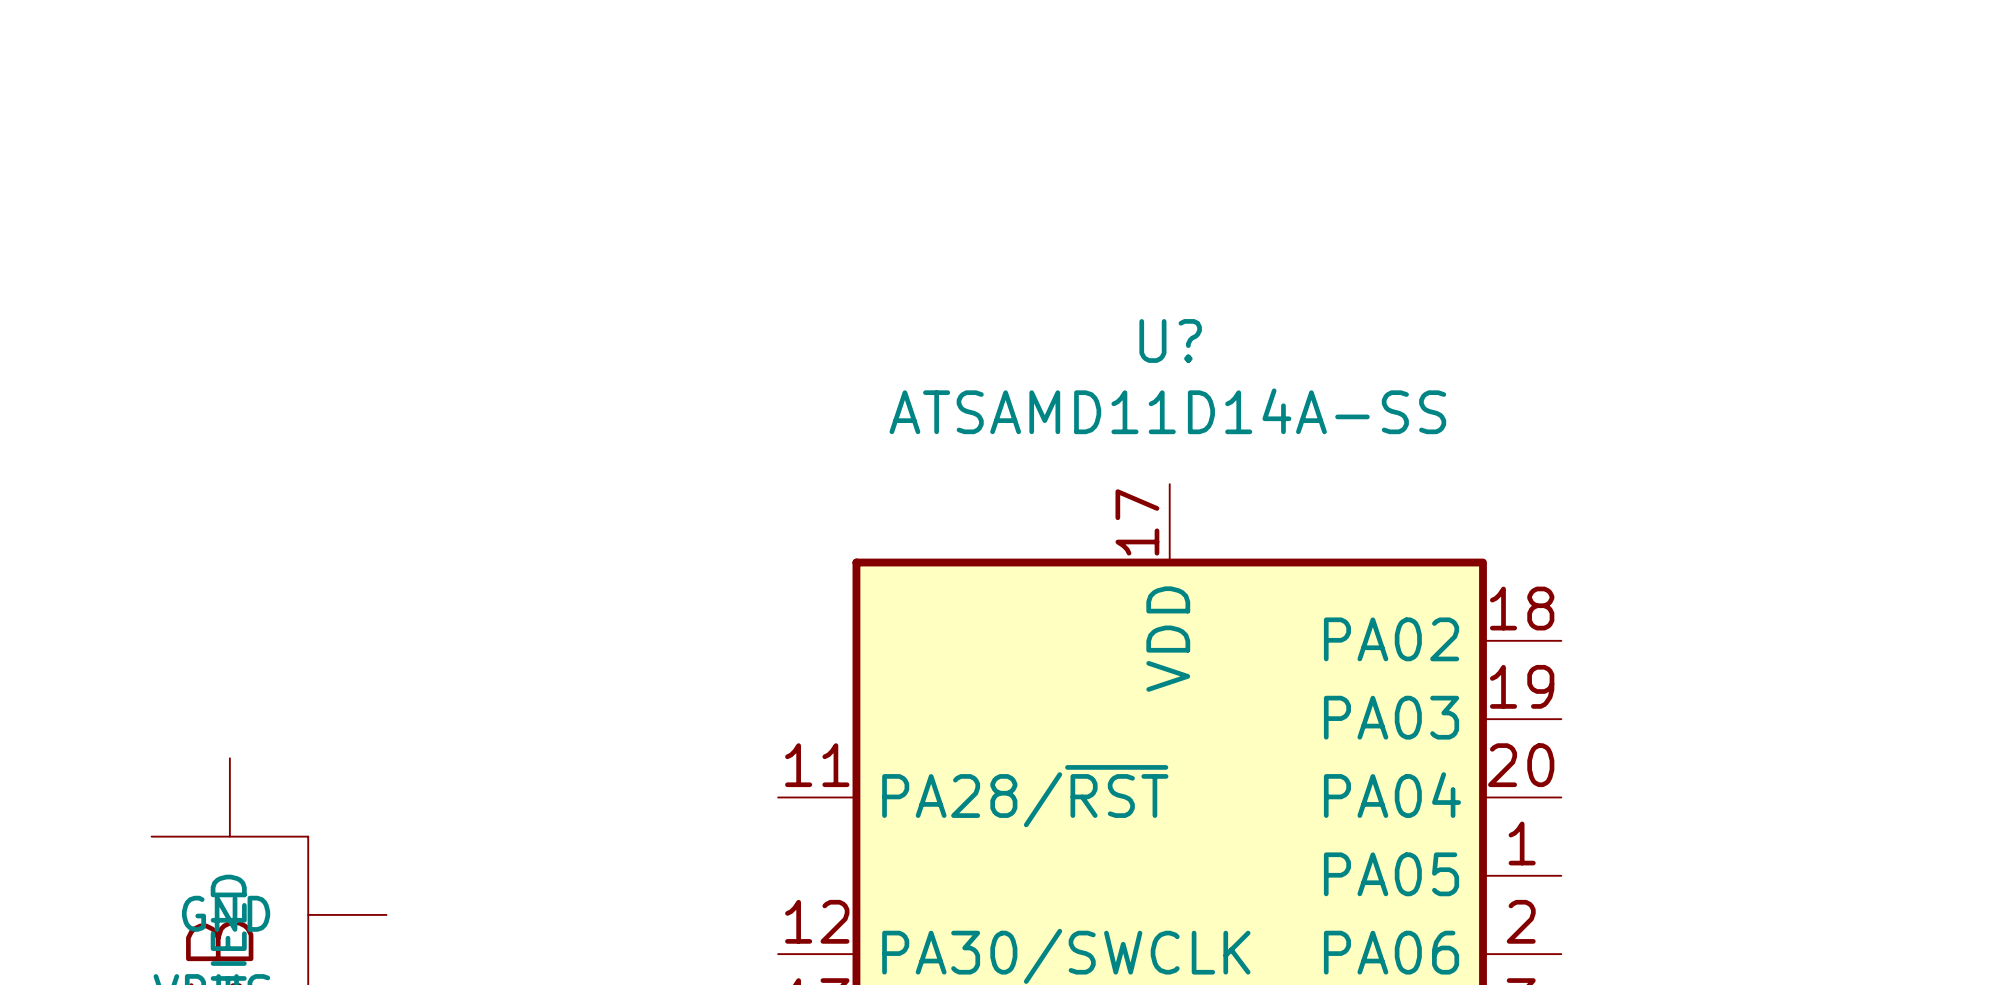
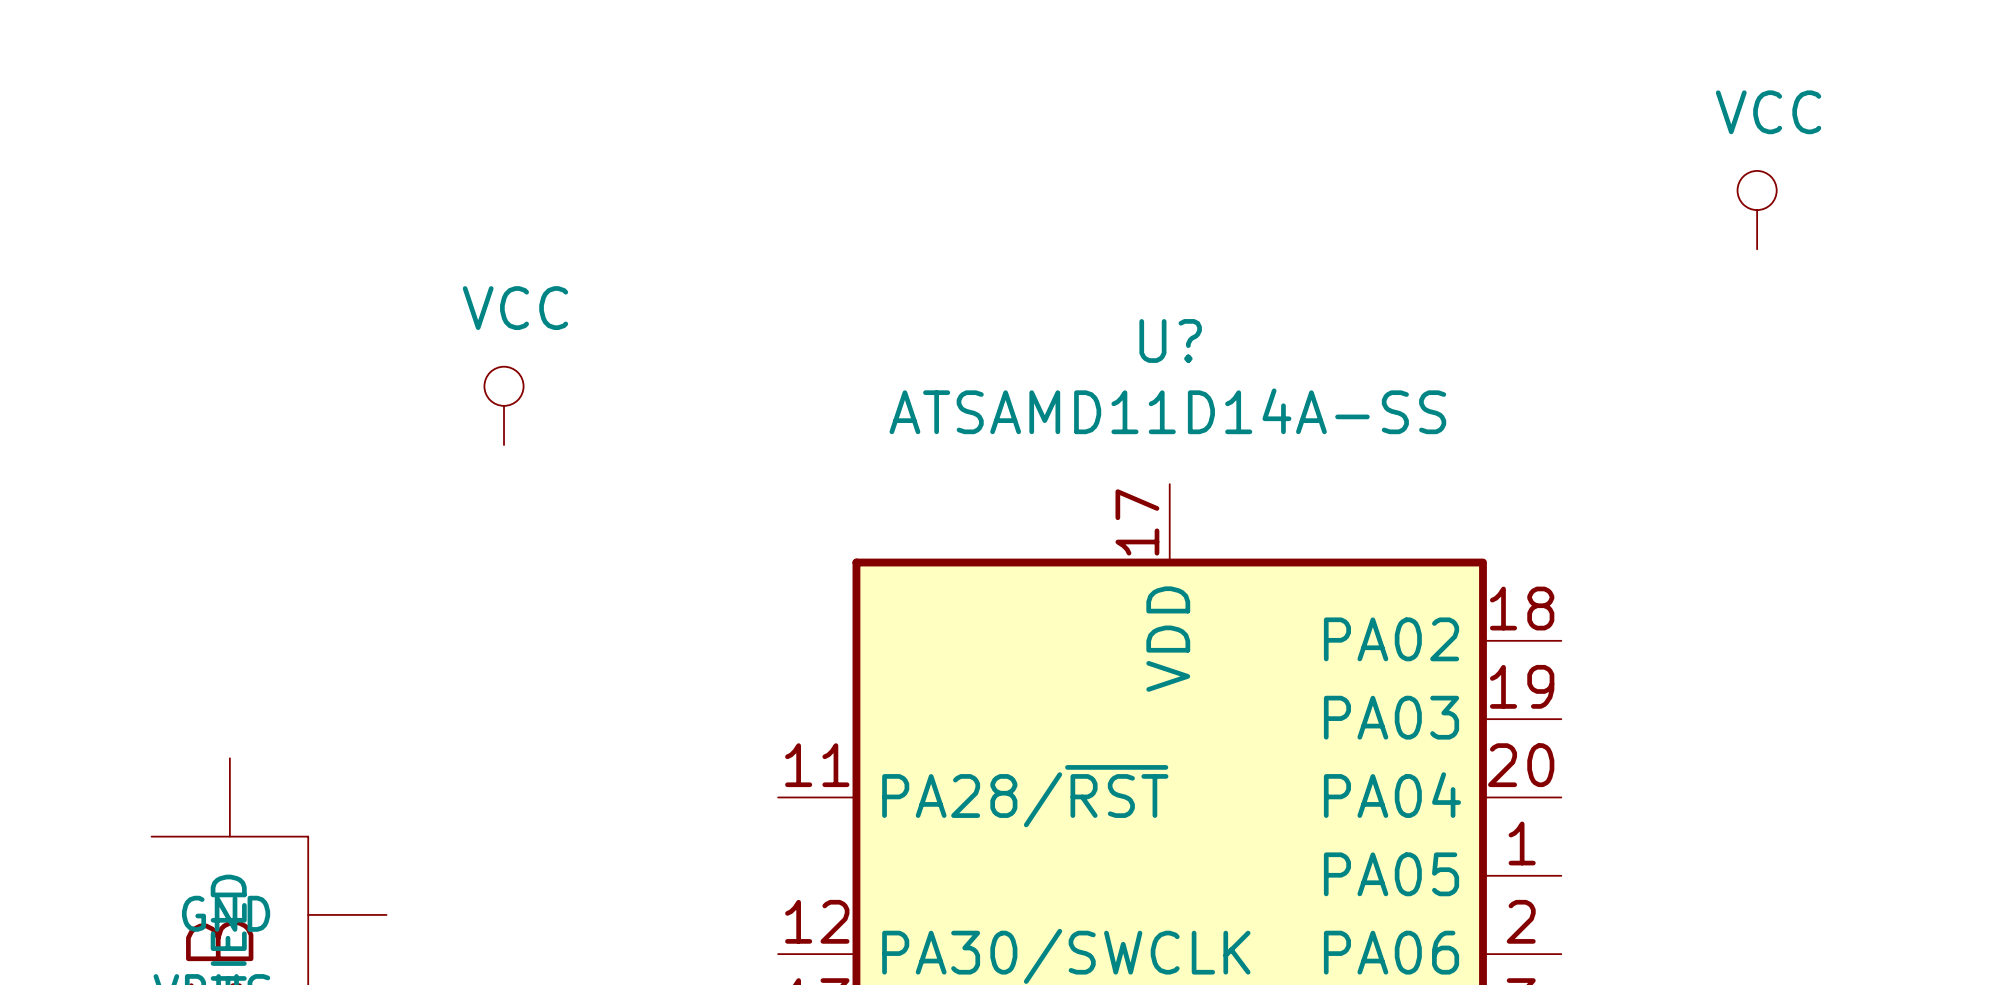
power symbol: none -> VCC (1757, 210)
power symbol: none -> VCC (504, 405)

